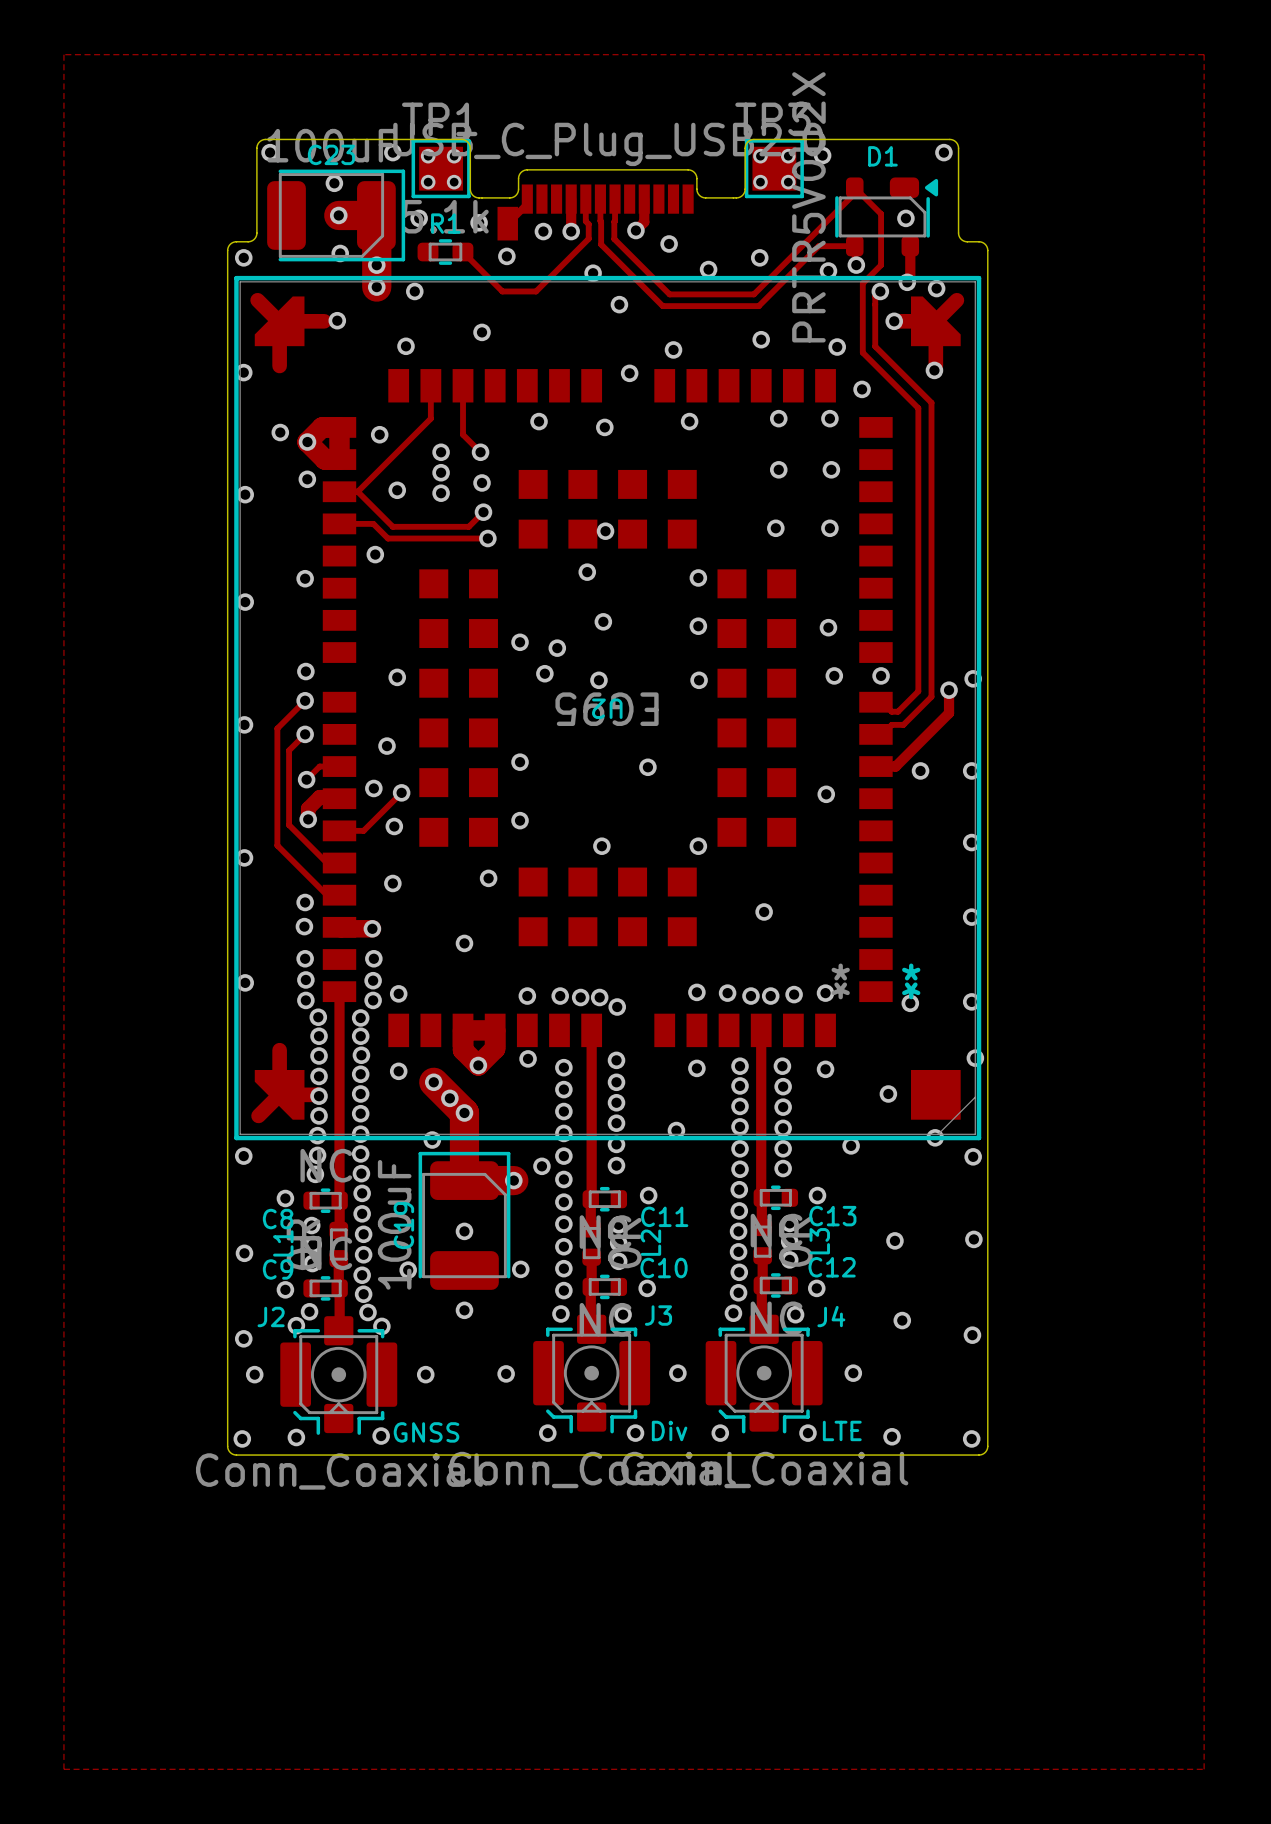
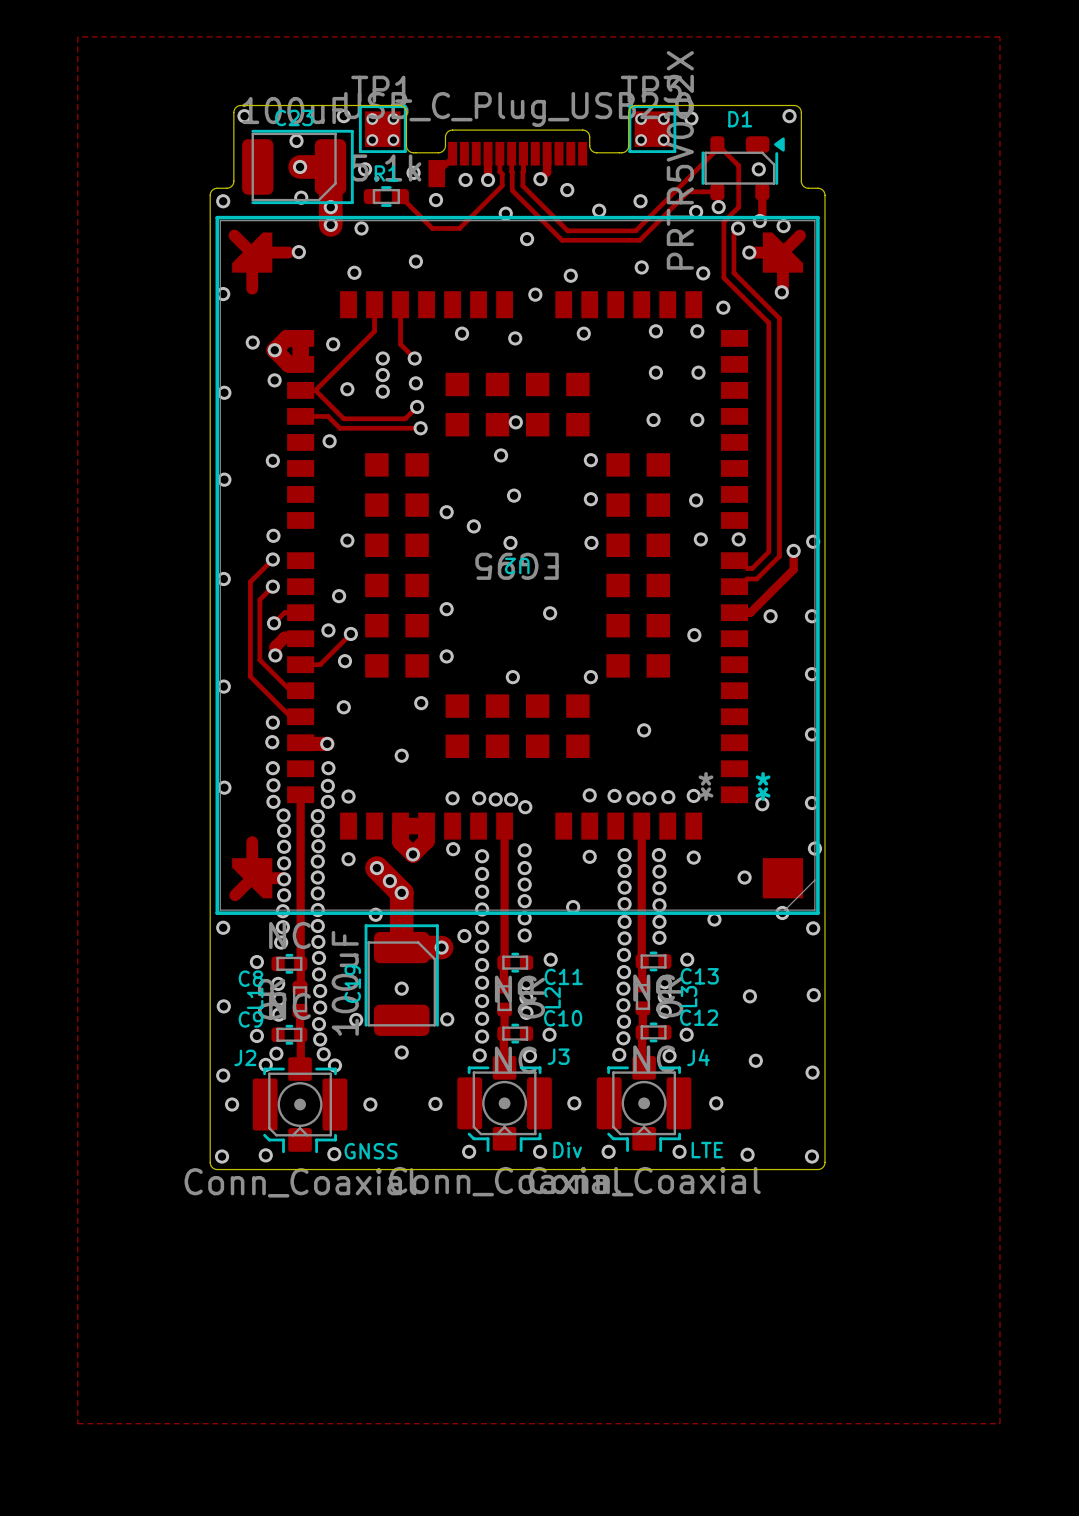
via: (557, 648) -> none
via: none -> (473, 526)
via: (544, 673) -> none

